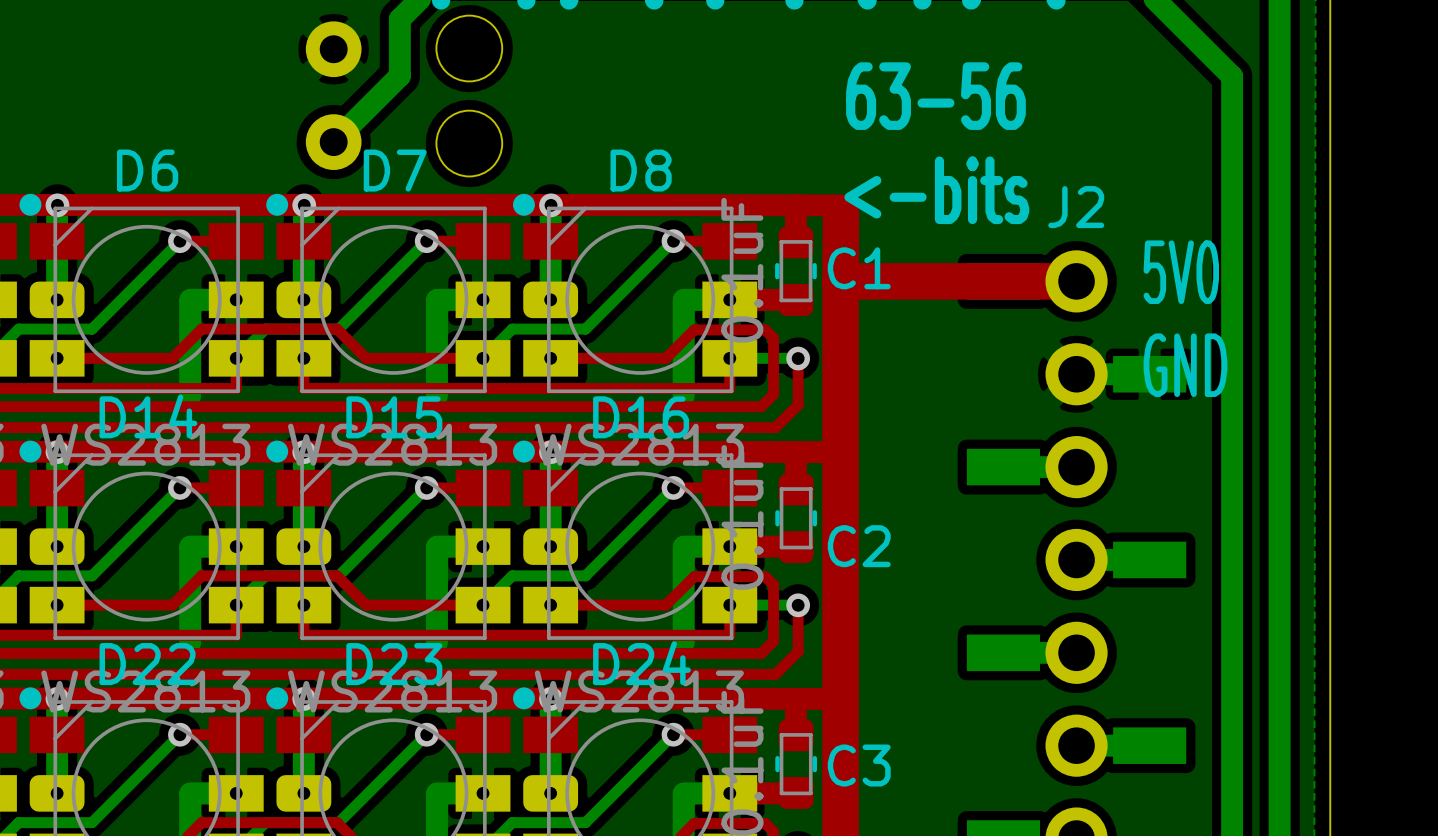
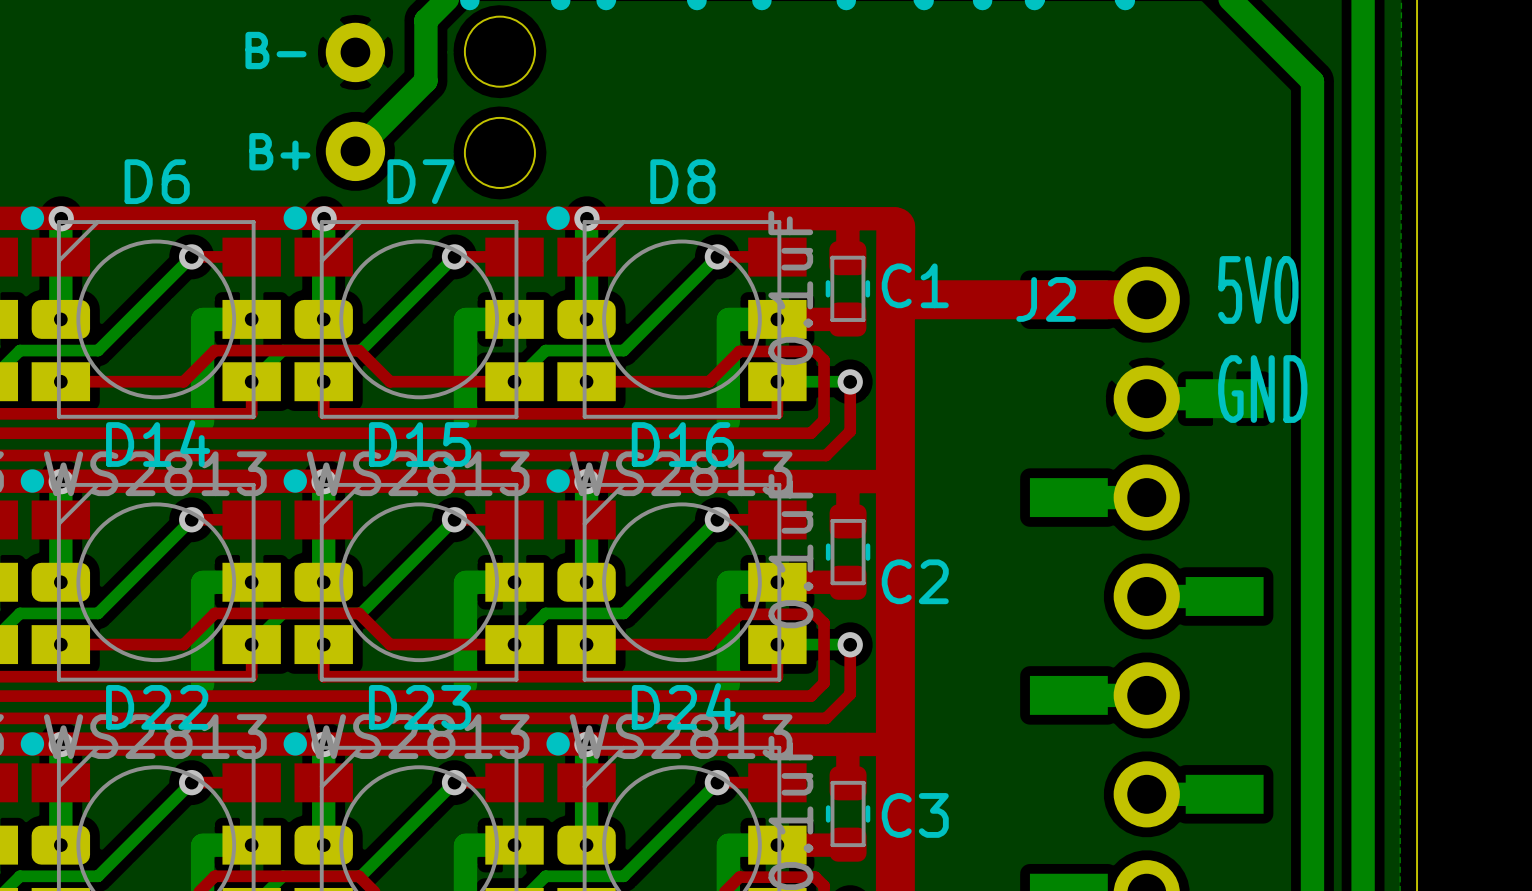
text: none -> B- (275, 50)
text: 63-56 (935, 96) -> none
text: none -> B+ (279, 151)
text: <-bits (936, 190) -> none
text position: J2 (1076, 207) -> J2 (1046, 299)

